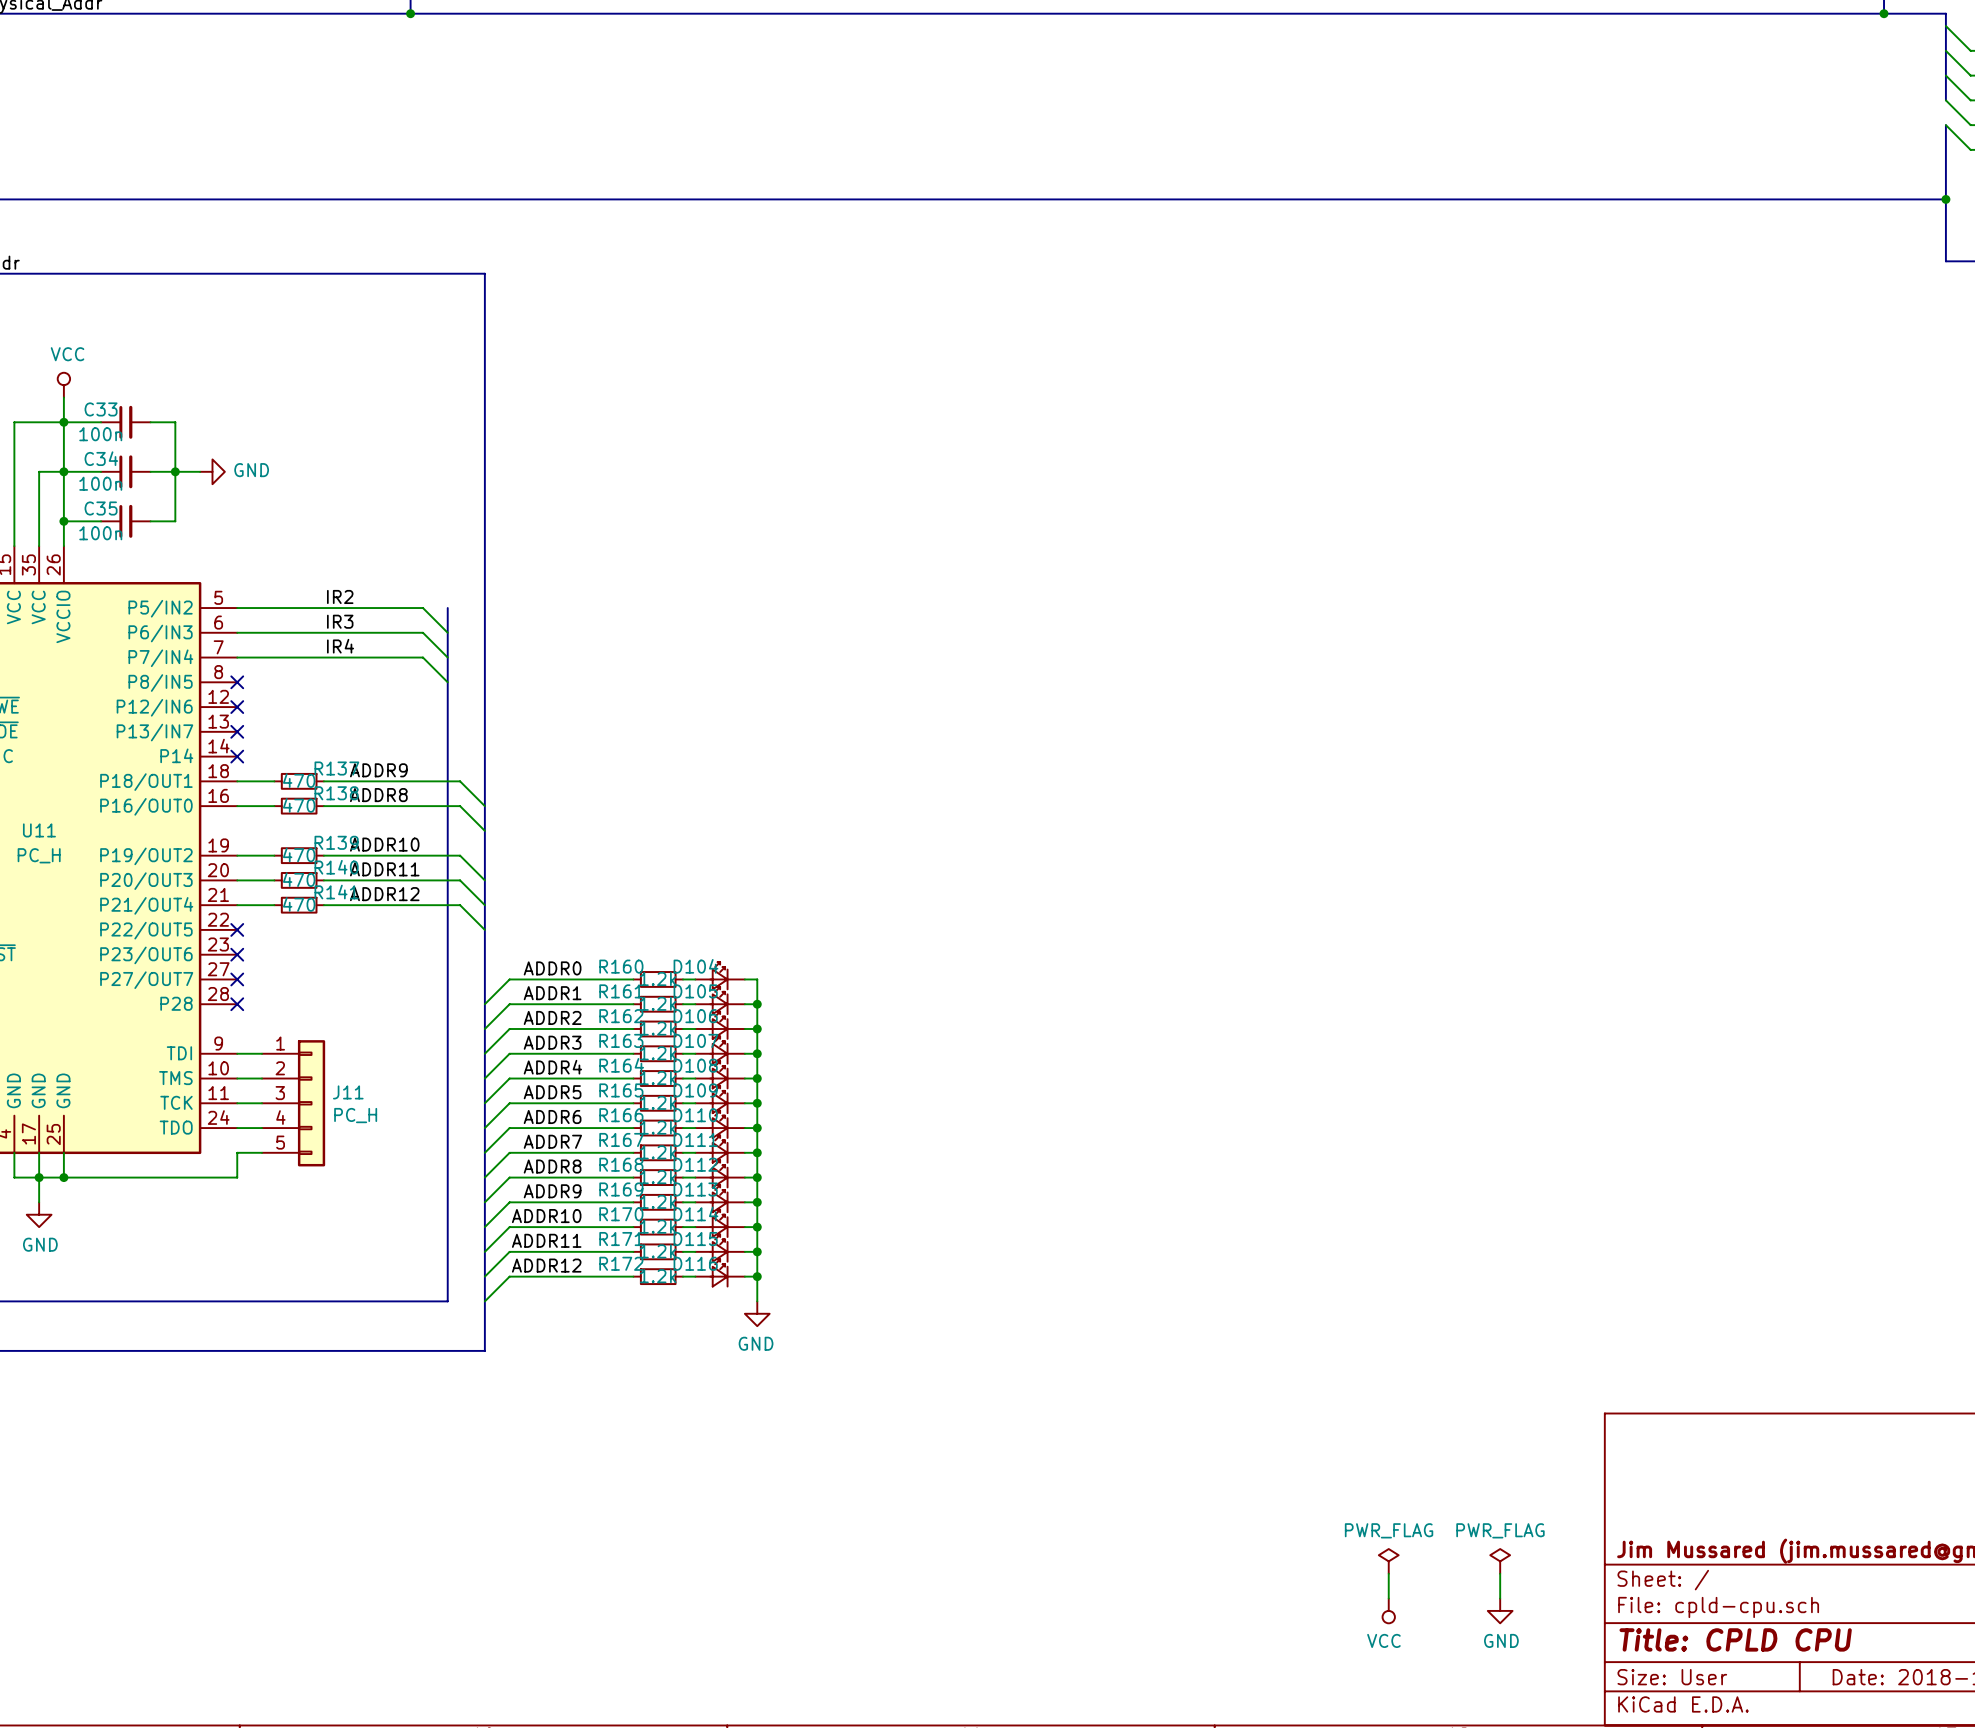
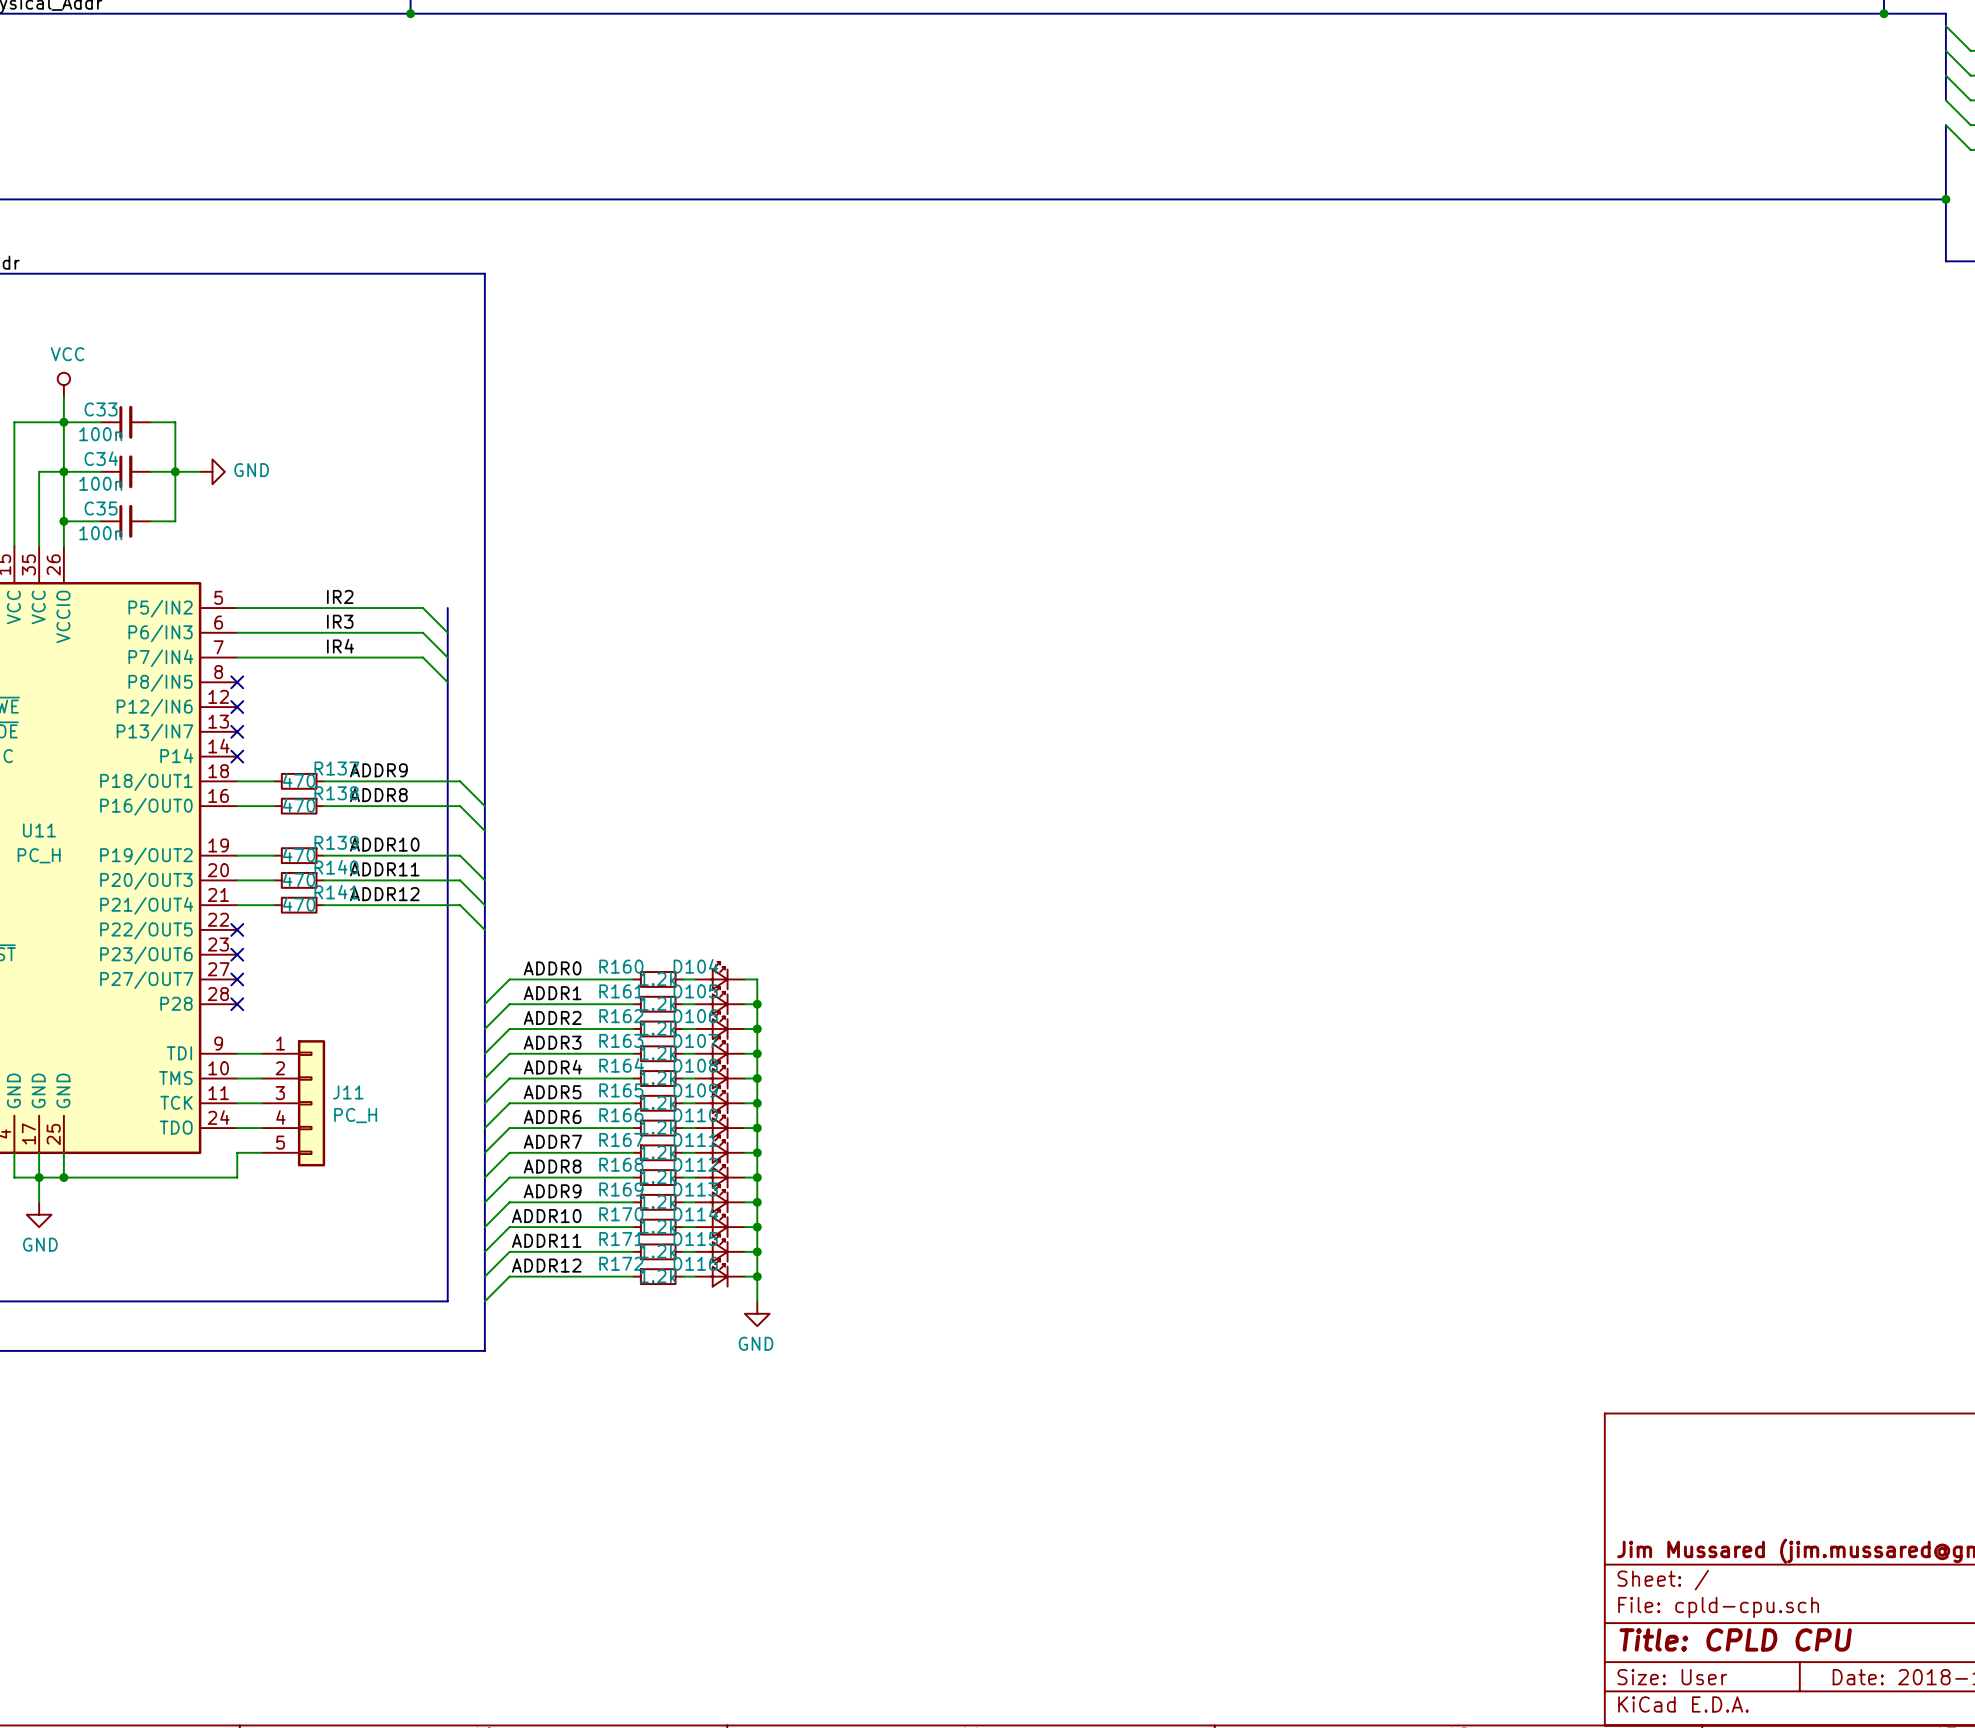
power symbol: PWR_FLAG (1388, 1561) -> none
power symbol: PWR_FLAG (1500, 1561) -> none
wire: (1388, 1573) (1388, 1598) -> none
wire: (1500, 1573) (1500, 1598) -> none
power symbol: VCC (1388, 1610) -> none
power symbol: GND (1500, 1610) -> none

